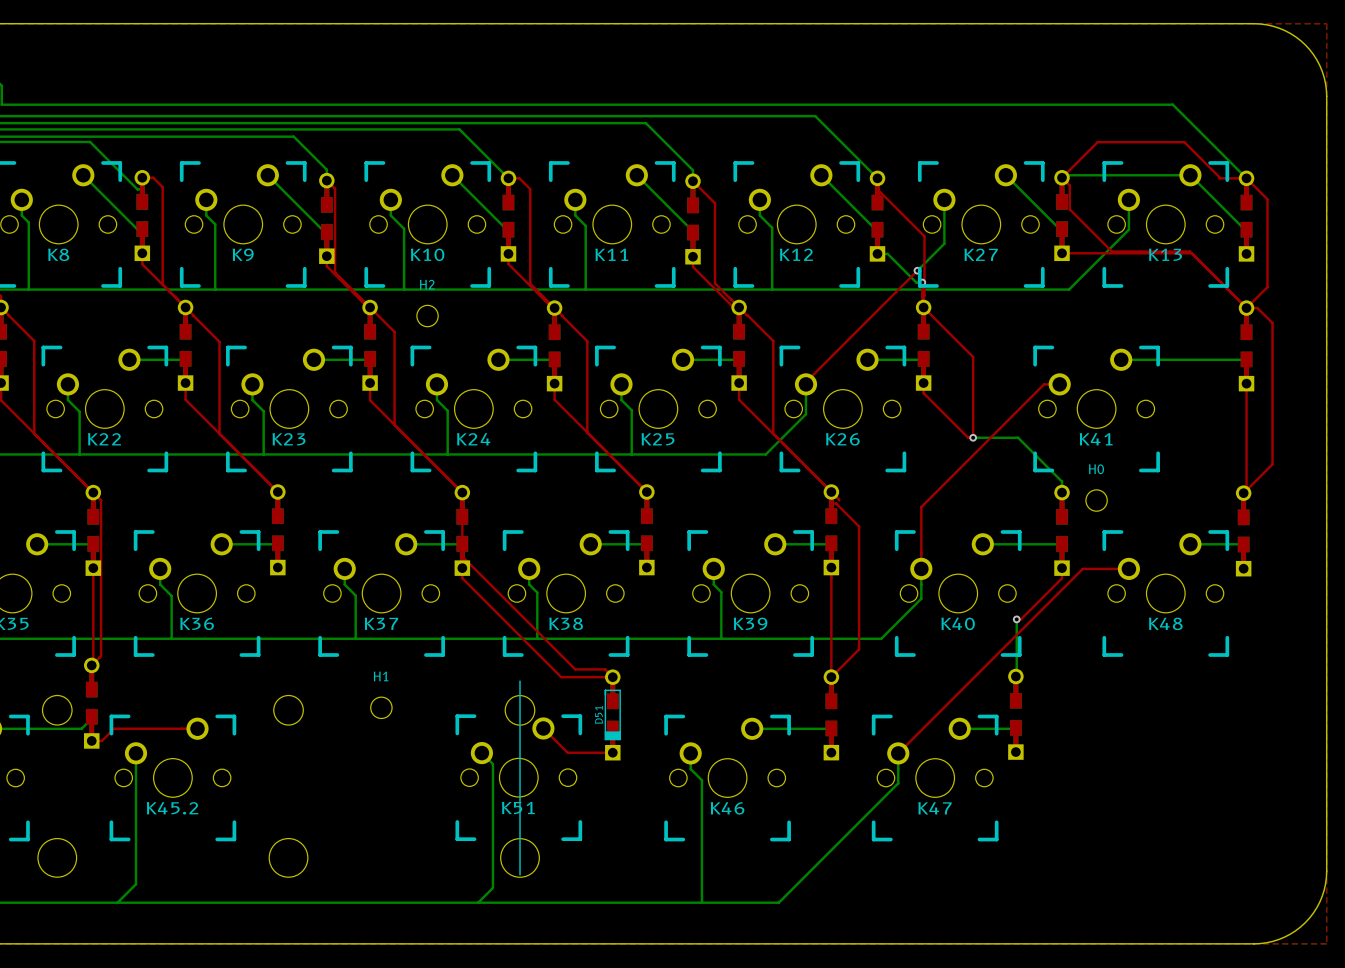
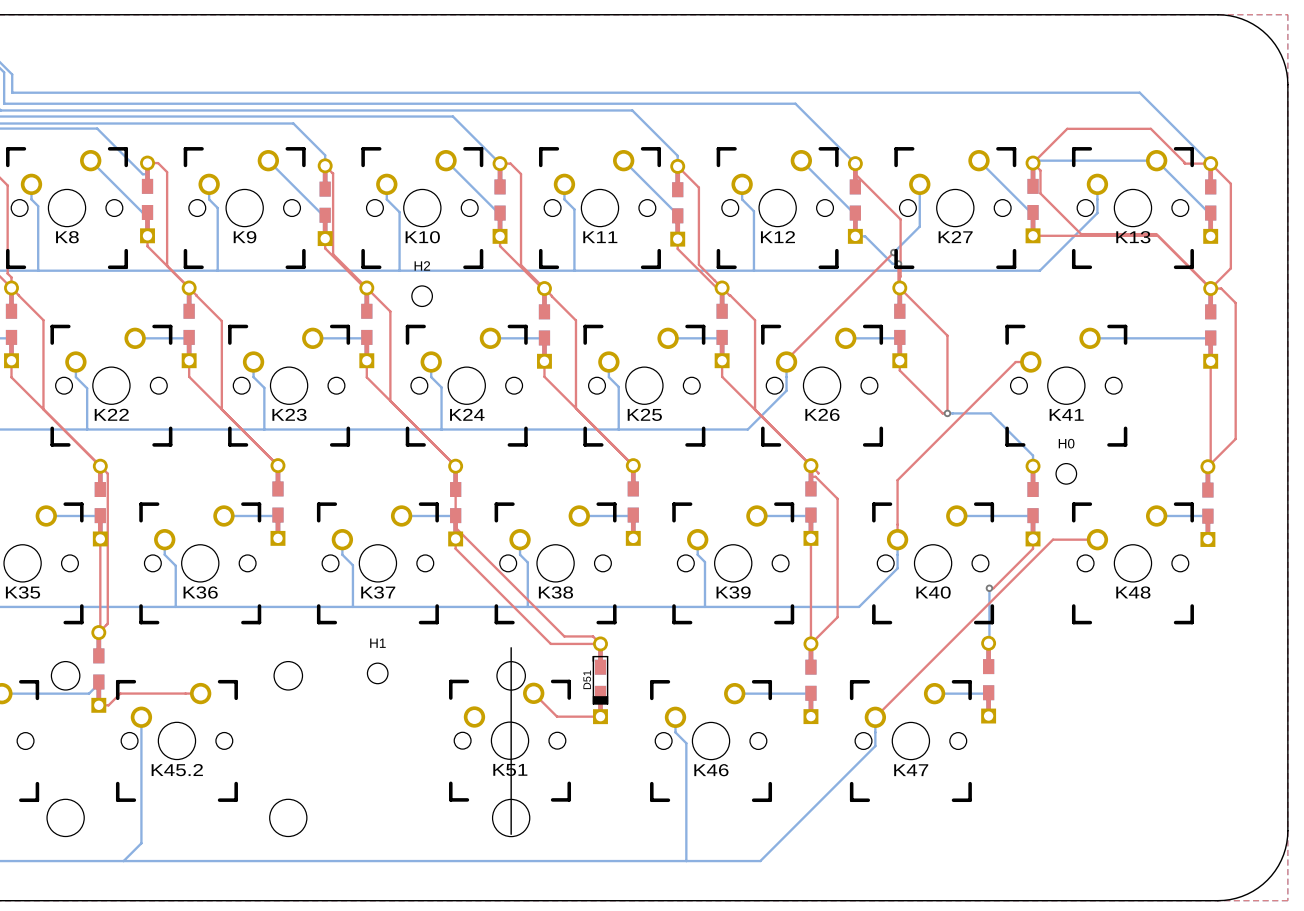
bottom track: (481, 753) (492, 764) (492, 887) (478, 902) -> none

